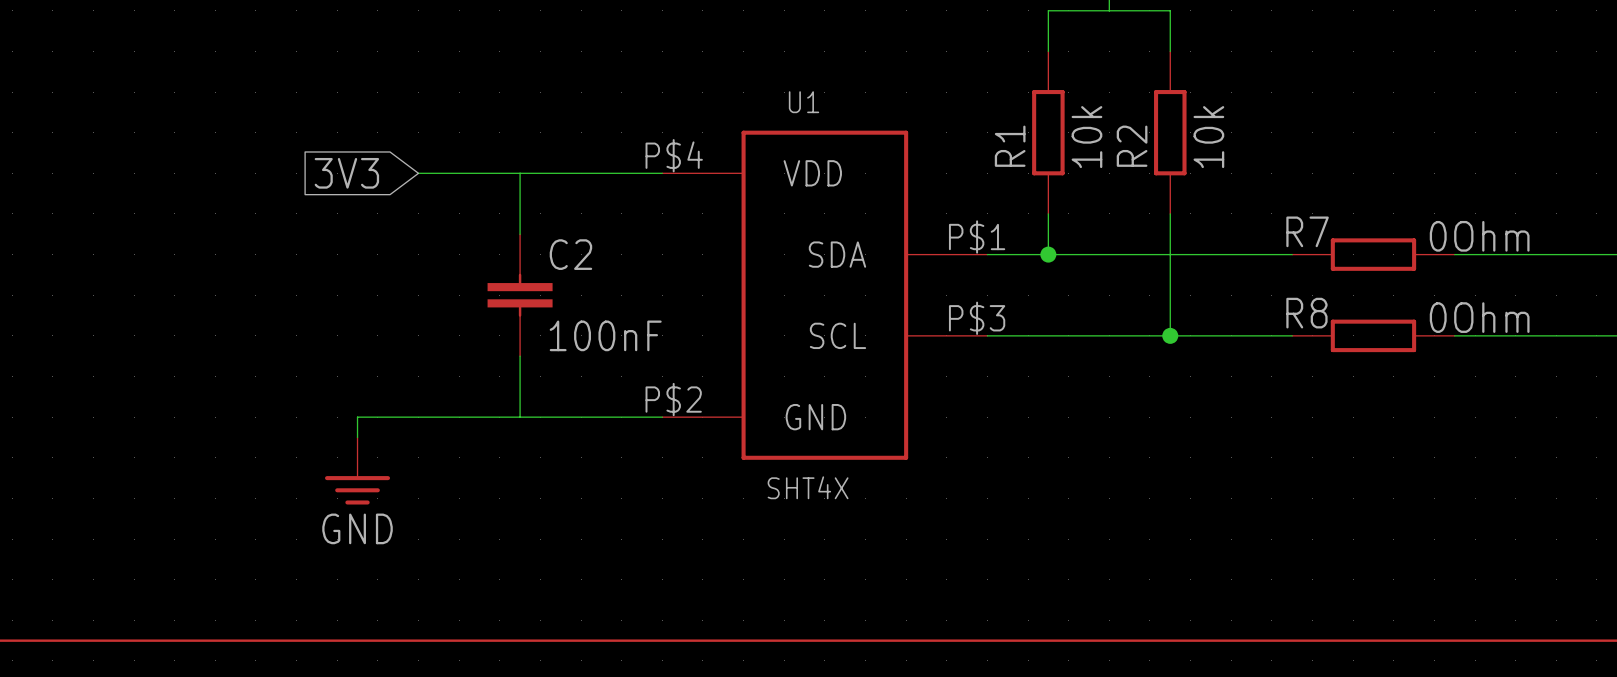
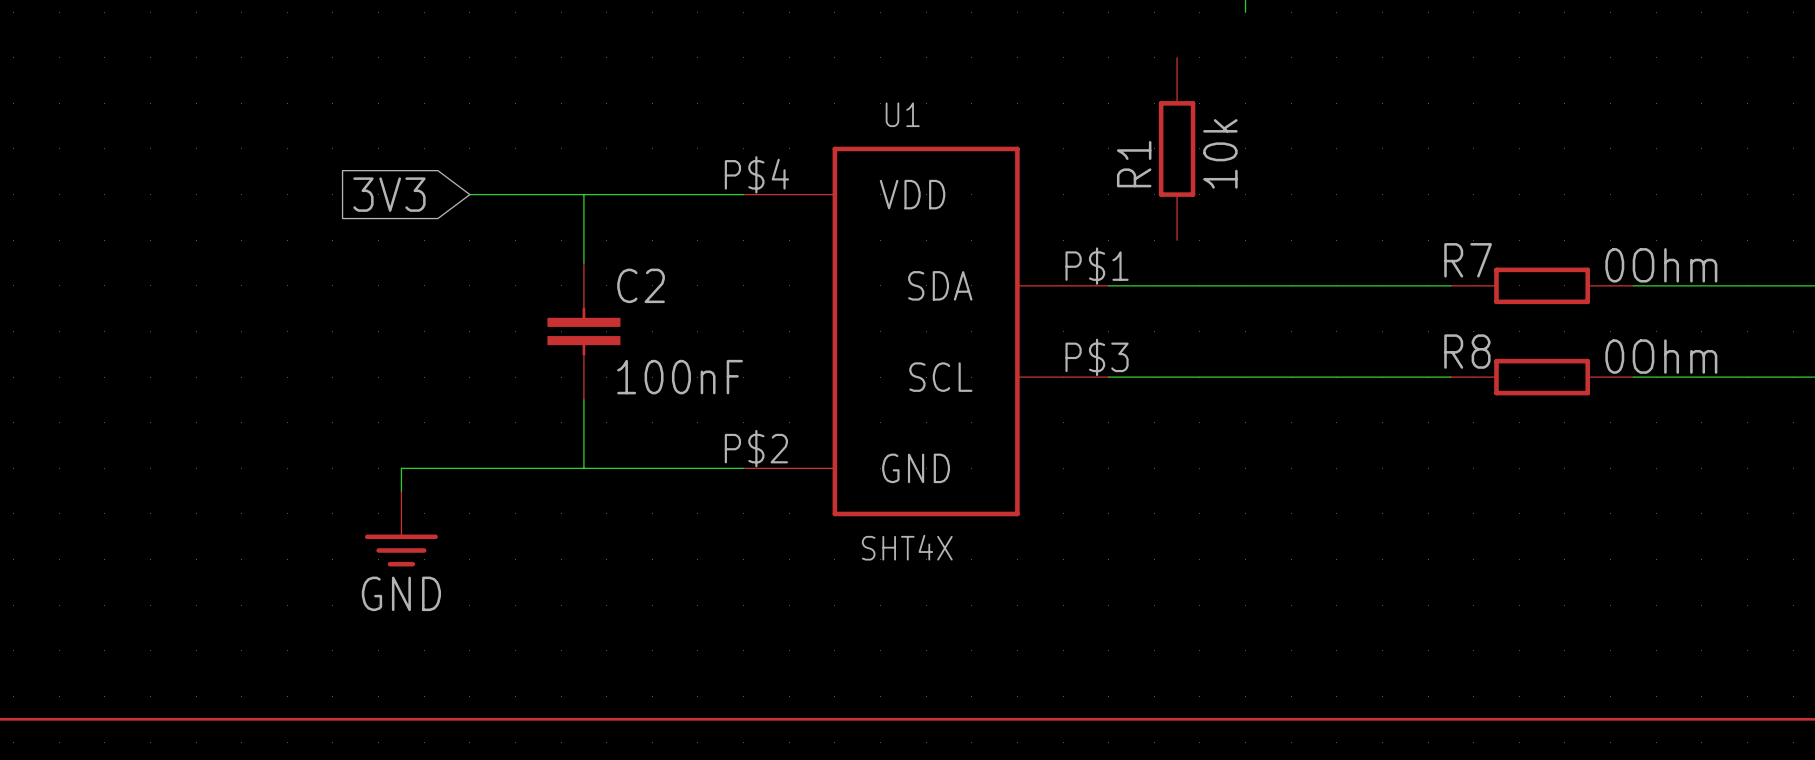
wire: (1048, 51) (1048, 10) (1170, 10) (1170, 51) -> none
R2: 10k (1170, 132) -> none
wire: (1048, 213) (1048, 254) -> none
wire: (1170, 213) (1170, 335) -> none
junction: (1048, 254) -> none
junction: (1170, 335) -> none

